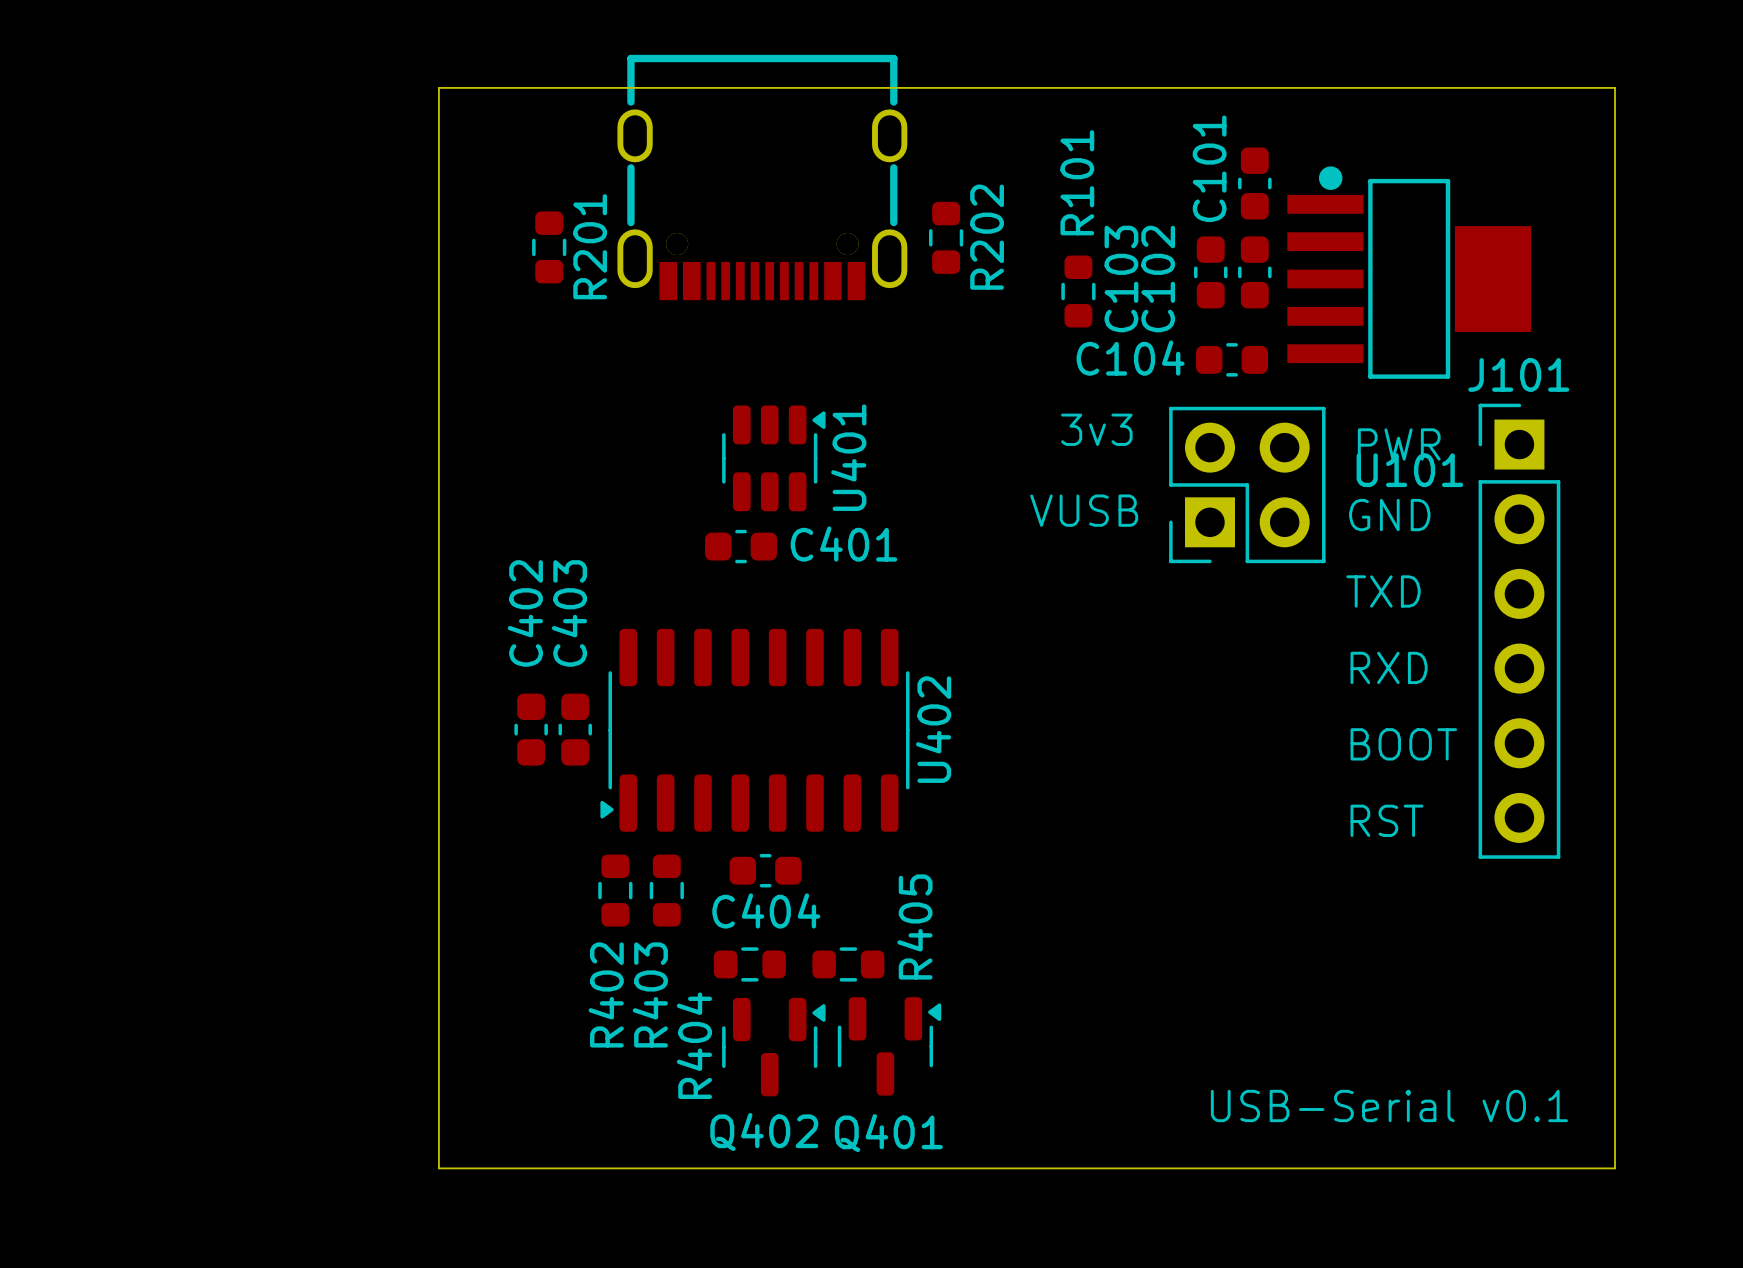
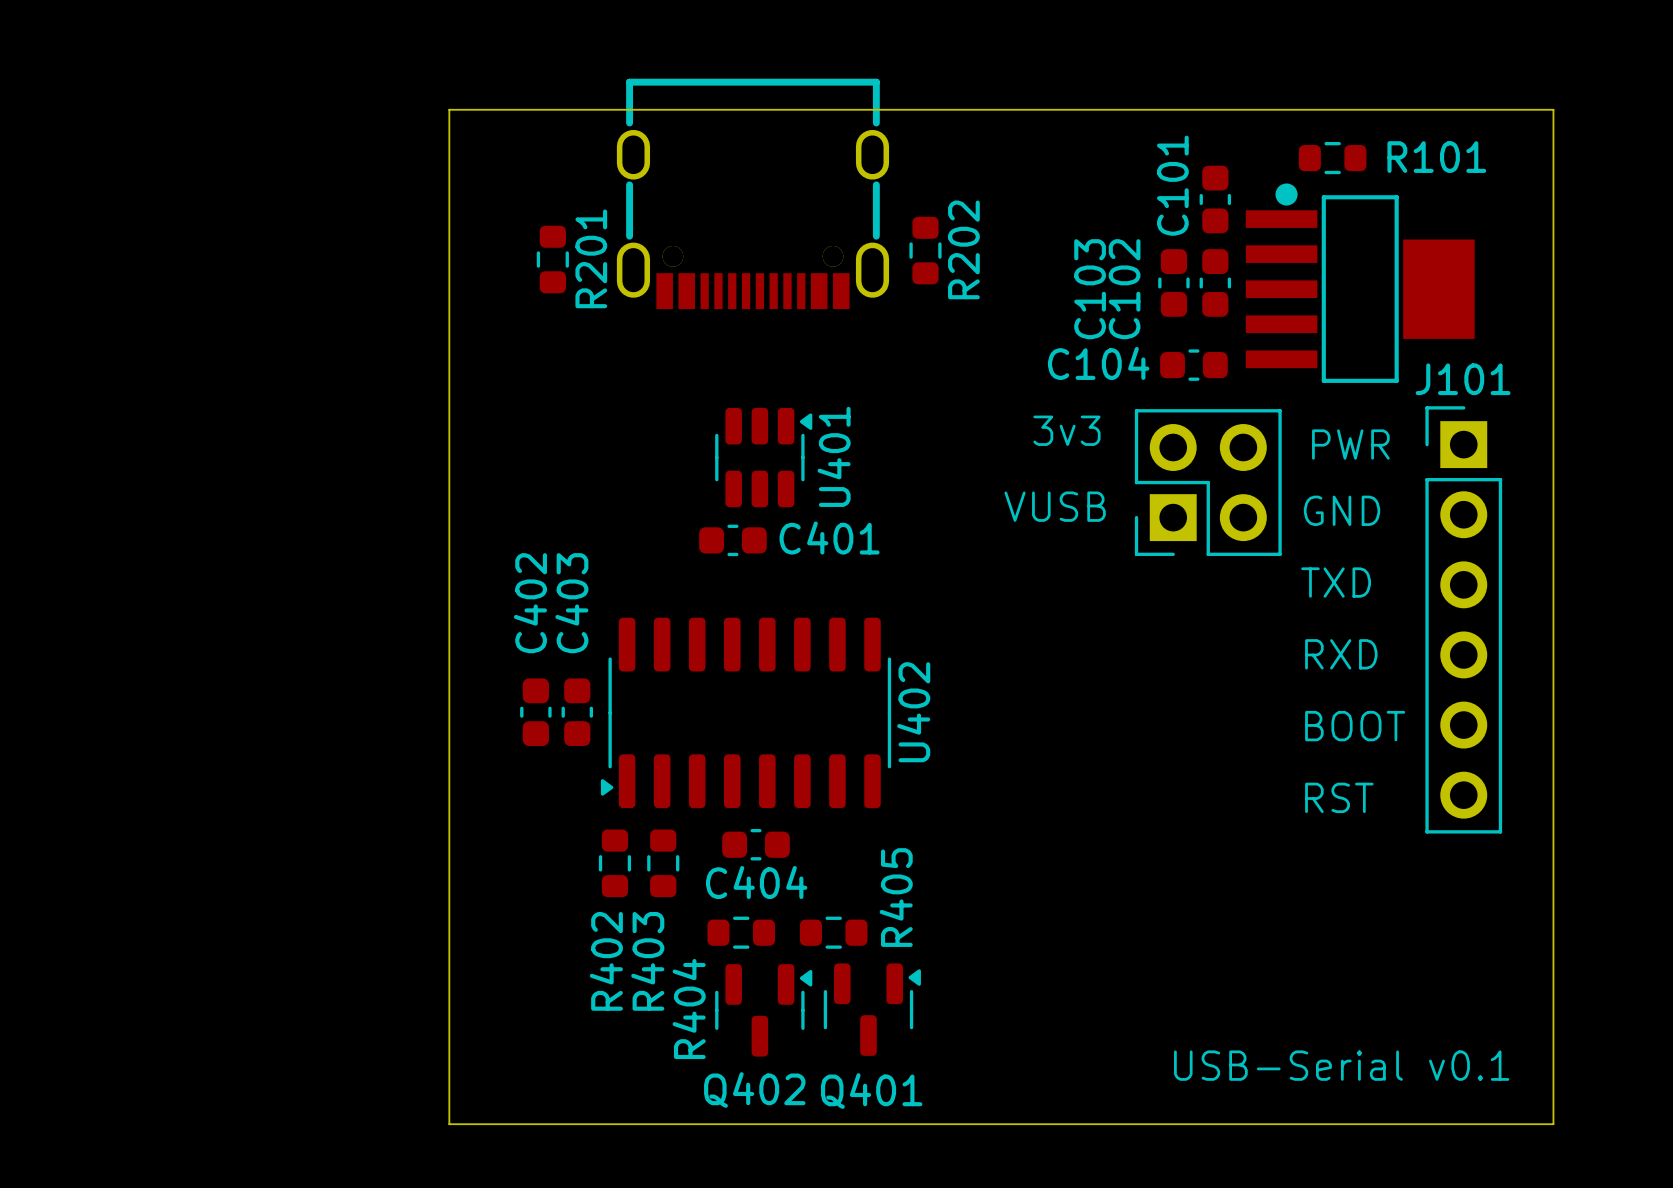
R101 rotation: 0° (1078, 291) -> 90° clockwise (1332, 158)
R101 position: (1078, 291) -> (1332, 158)
U101 name: U101 (1409, 470) -> none

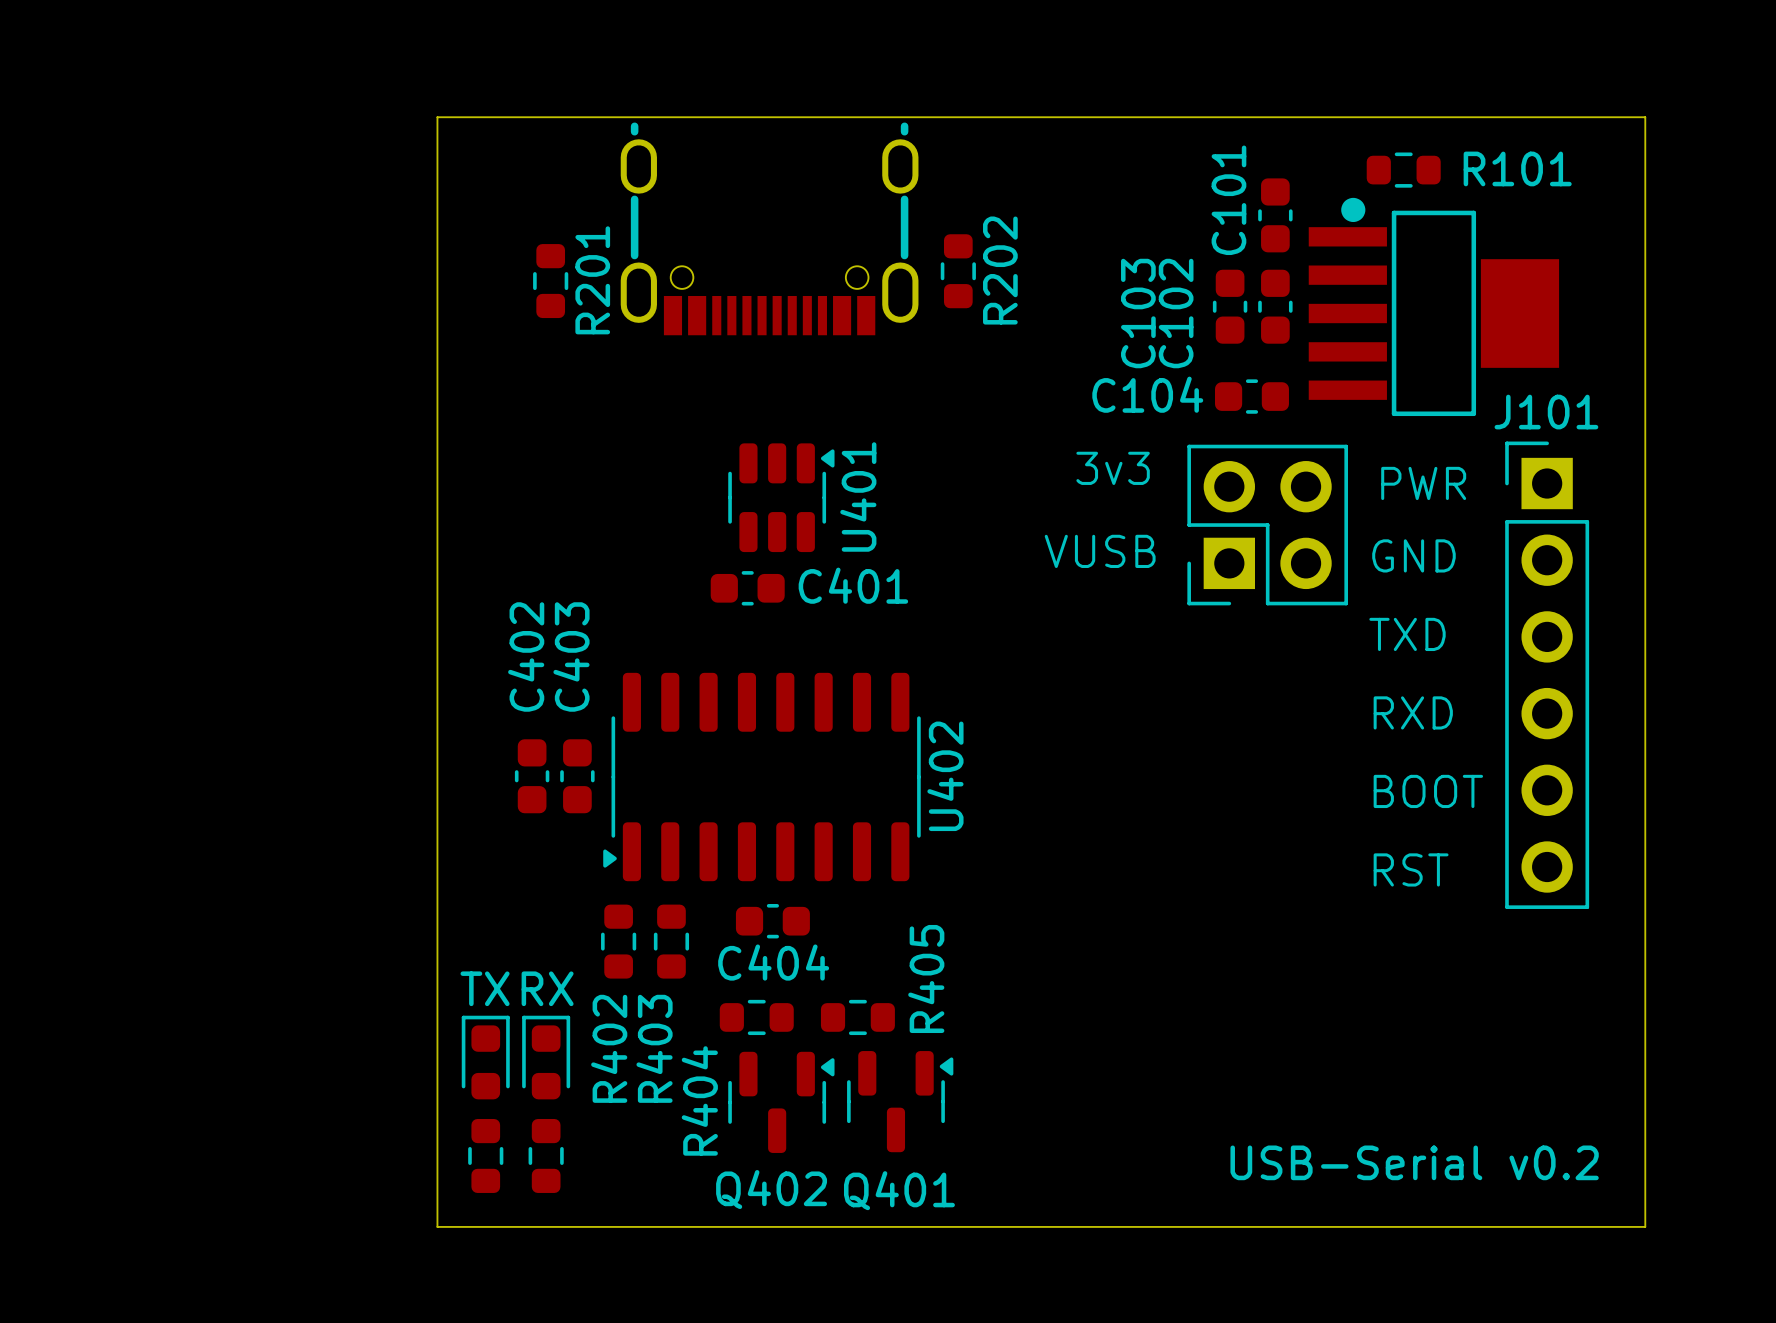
part footprint: [616, 78, 890, 310] -> [620, 122, 919, 336]
text: none -> TX (485, 988)
text: none -> RX (547, 988)
part: none -> (485, 1057)
part: none -> (546, 1057)
part: none -> (485, 1155)
part: none -> (546, 1155)
text: USB-Serial v0.1 (1341, 1065) -> USB-Serial v0.2 (1414, 1162)

